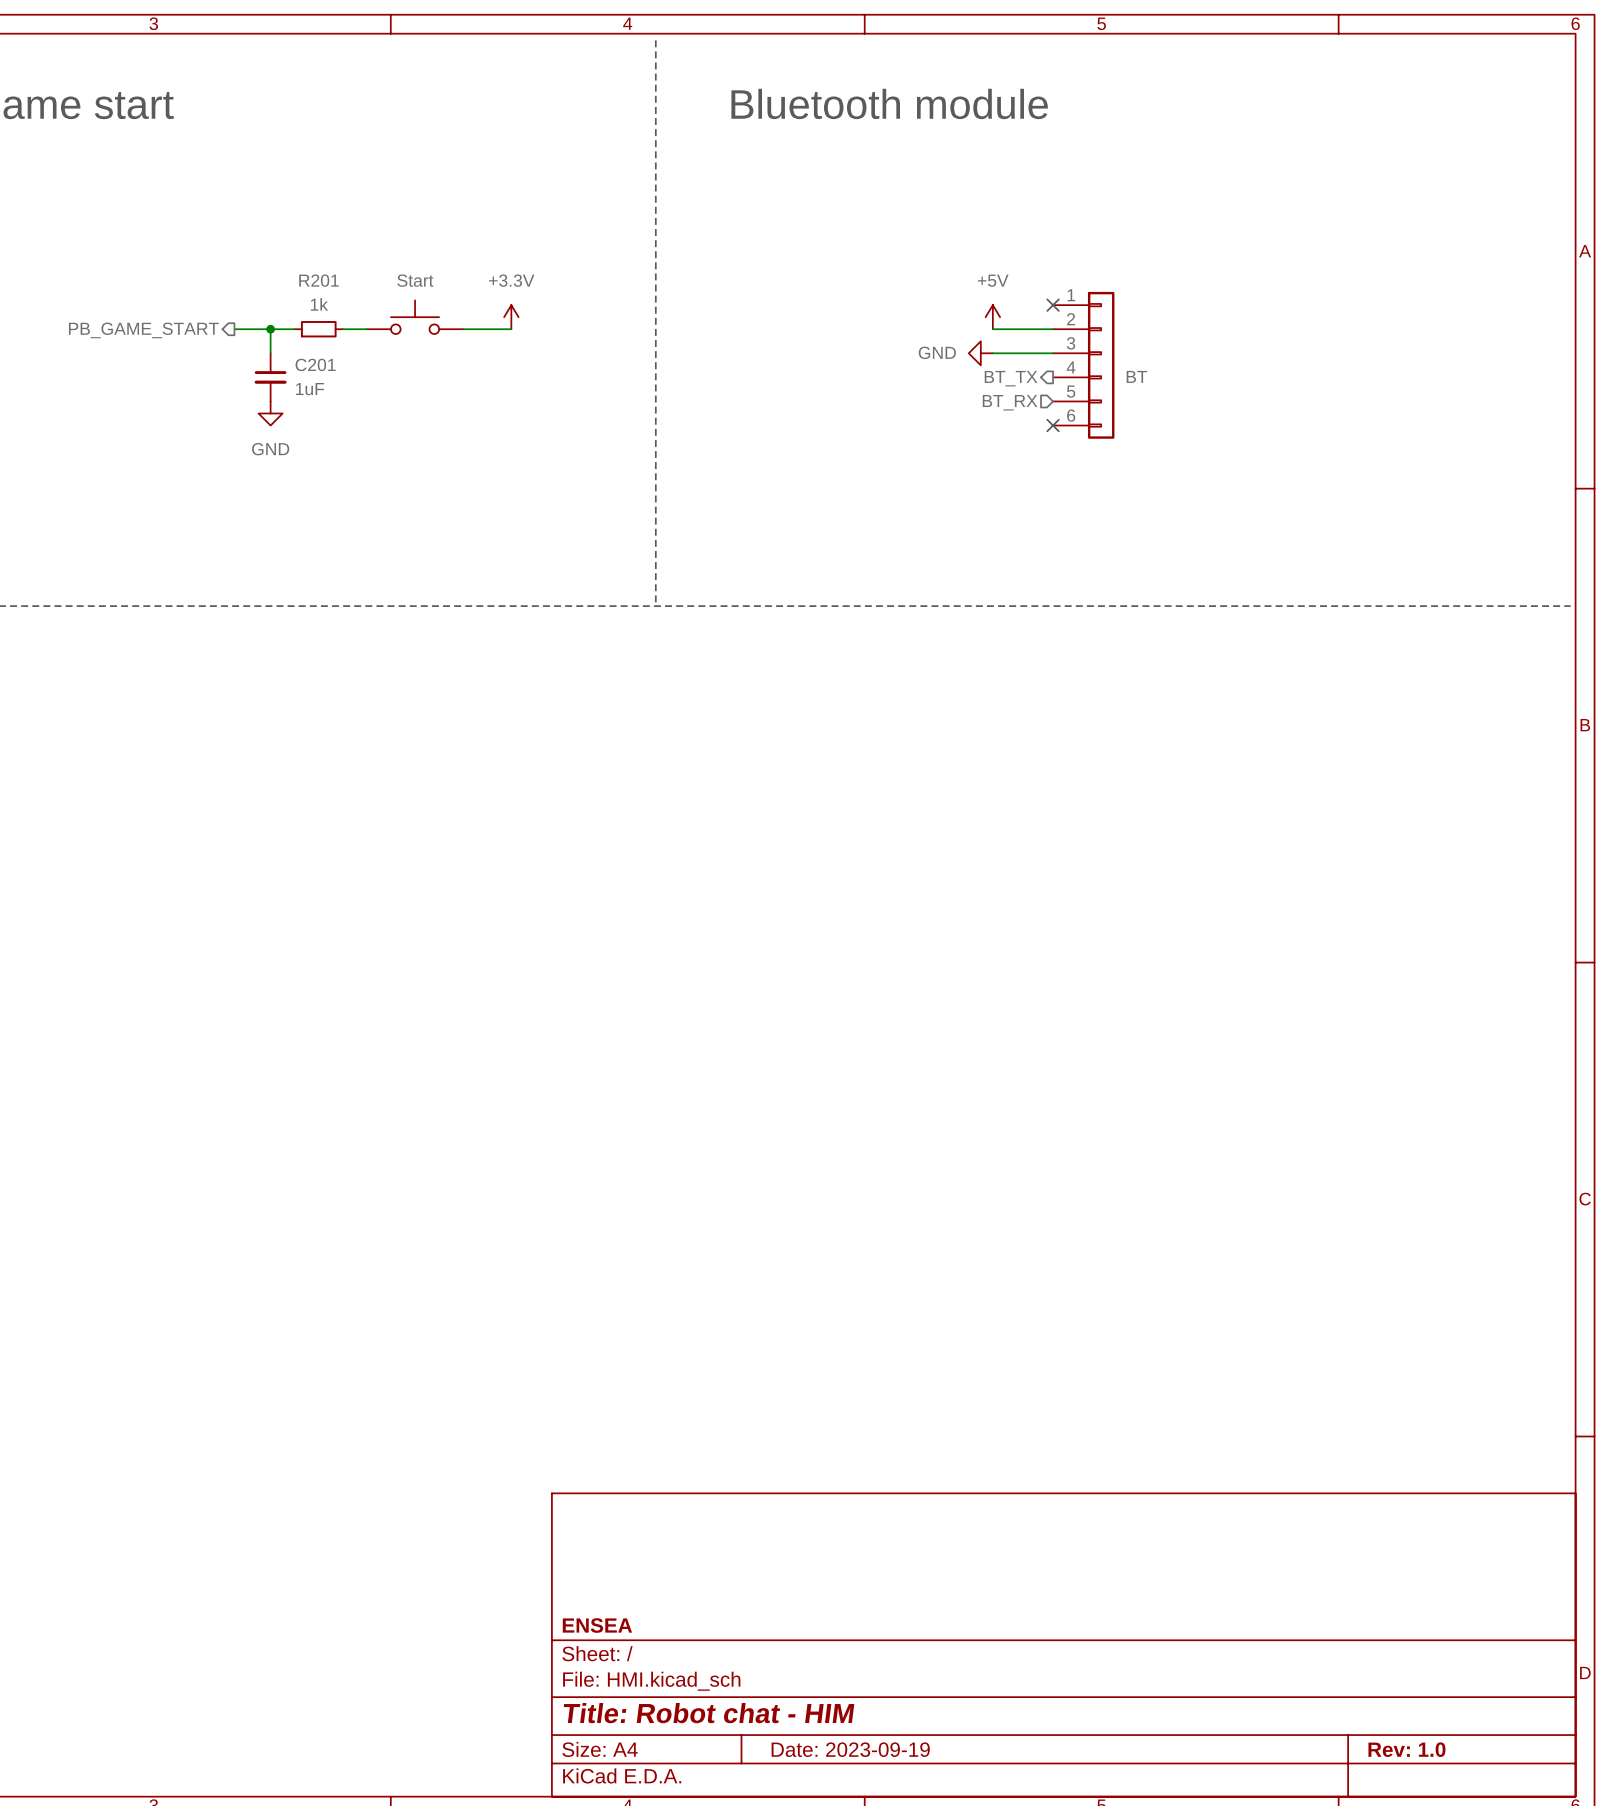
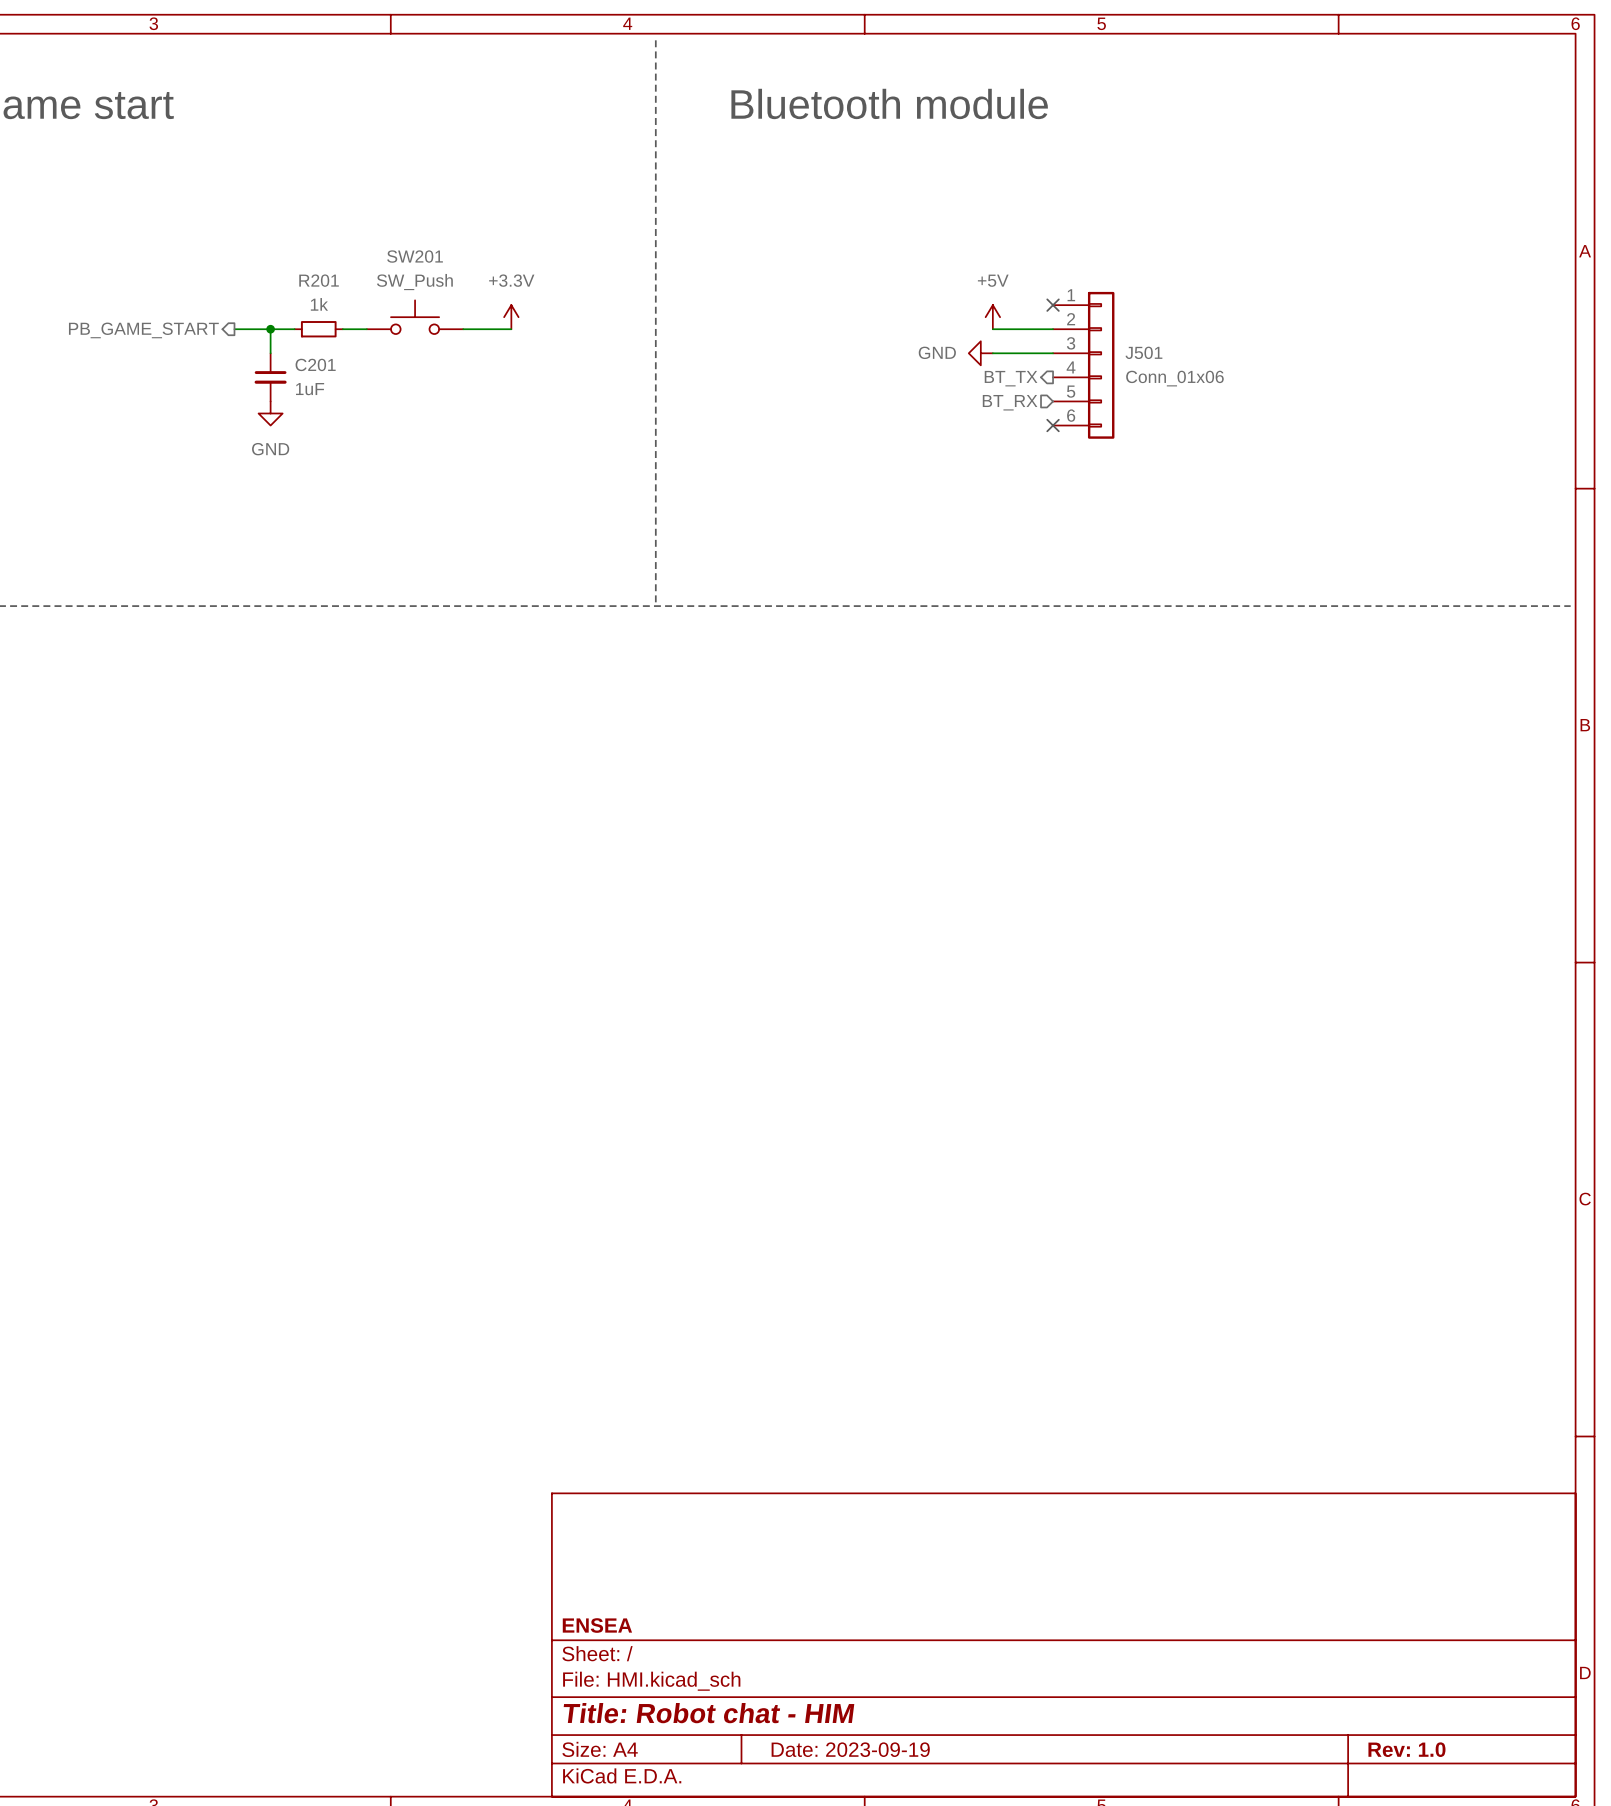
SW201 name: none -> SW201 (415, 256)
SW201 value: Start (415, 280) -> SW_Push (414, 282)
J501 name: none -> J501 (1143, 352)
J501 value: BT (1136, 376) -> Conn_01x06 (1174, 378)

